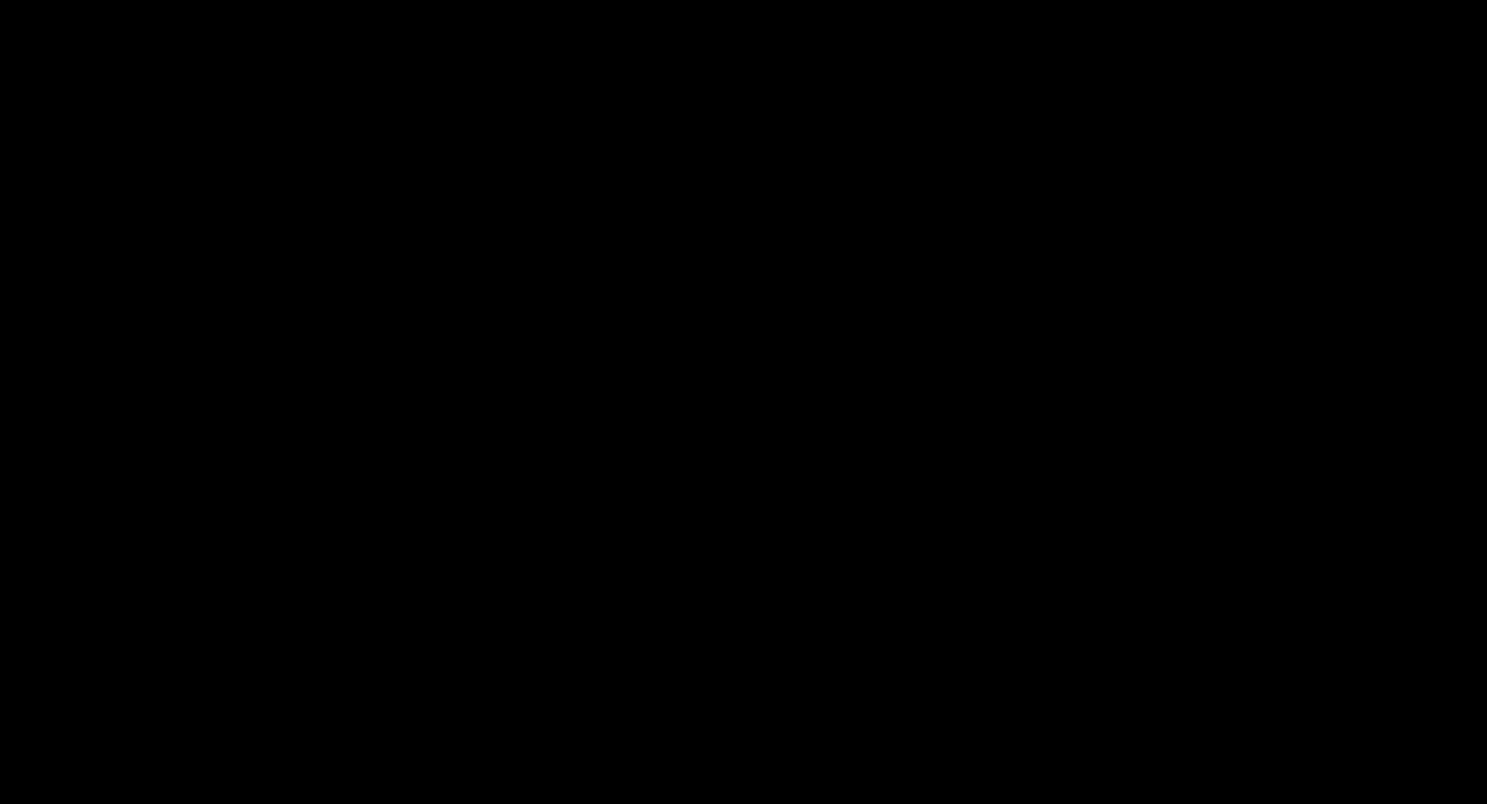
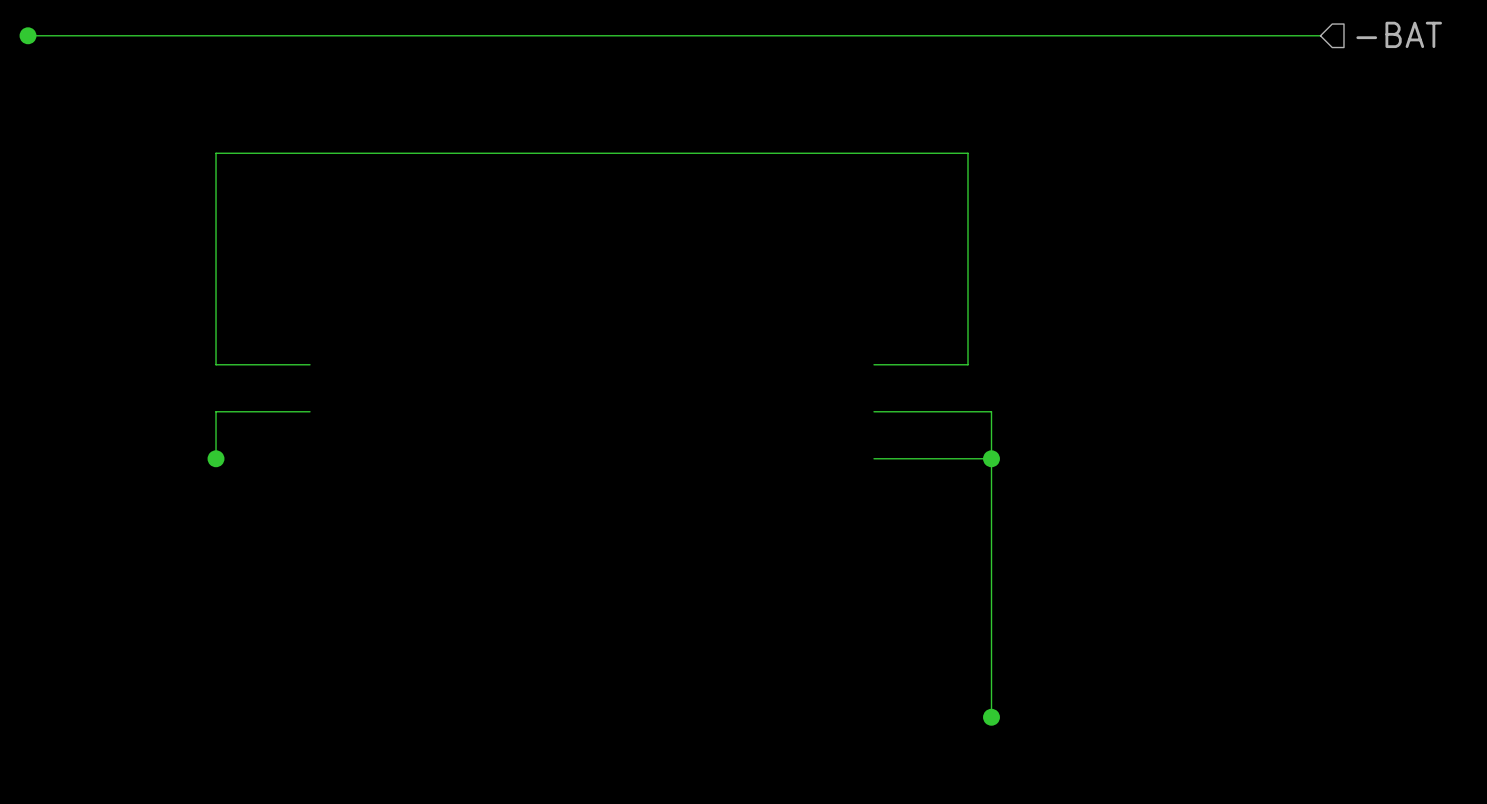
hierarchical label: none -> -BAT (1399, 34)
wire: none -> (28, 35) (1320, 35)
junction: none -> (28, 35)
wire: none -> (310, 364) (216, 364) (216, 153) (968, 153) (968, 364) (874, 364)
wire: none -> (310, 411) (216, 411) (216, 458)
wire: none -> (874, 411) (991, 411) (991, 717)
junction: none -> (216, 458)
wire: none -> (874, 458) (991, 458)
junction: none -> (991, 458)
junction: none -> (991, 717)

